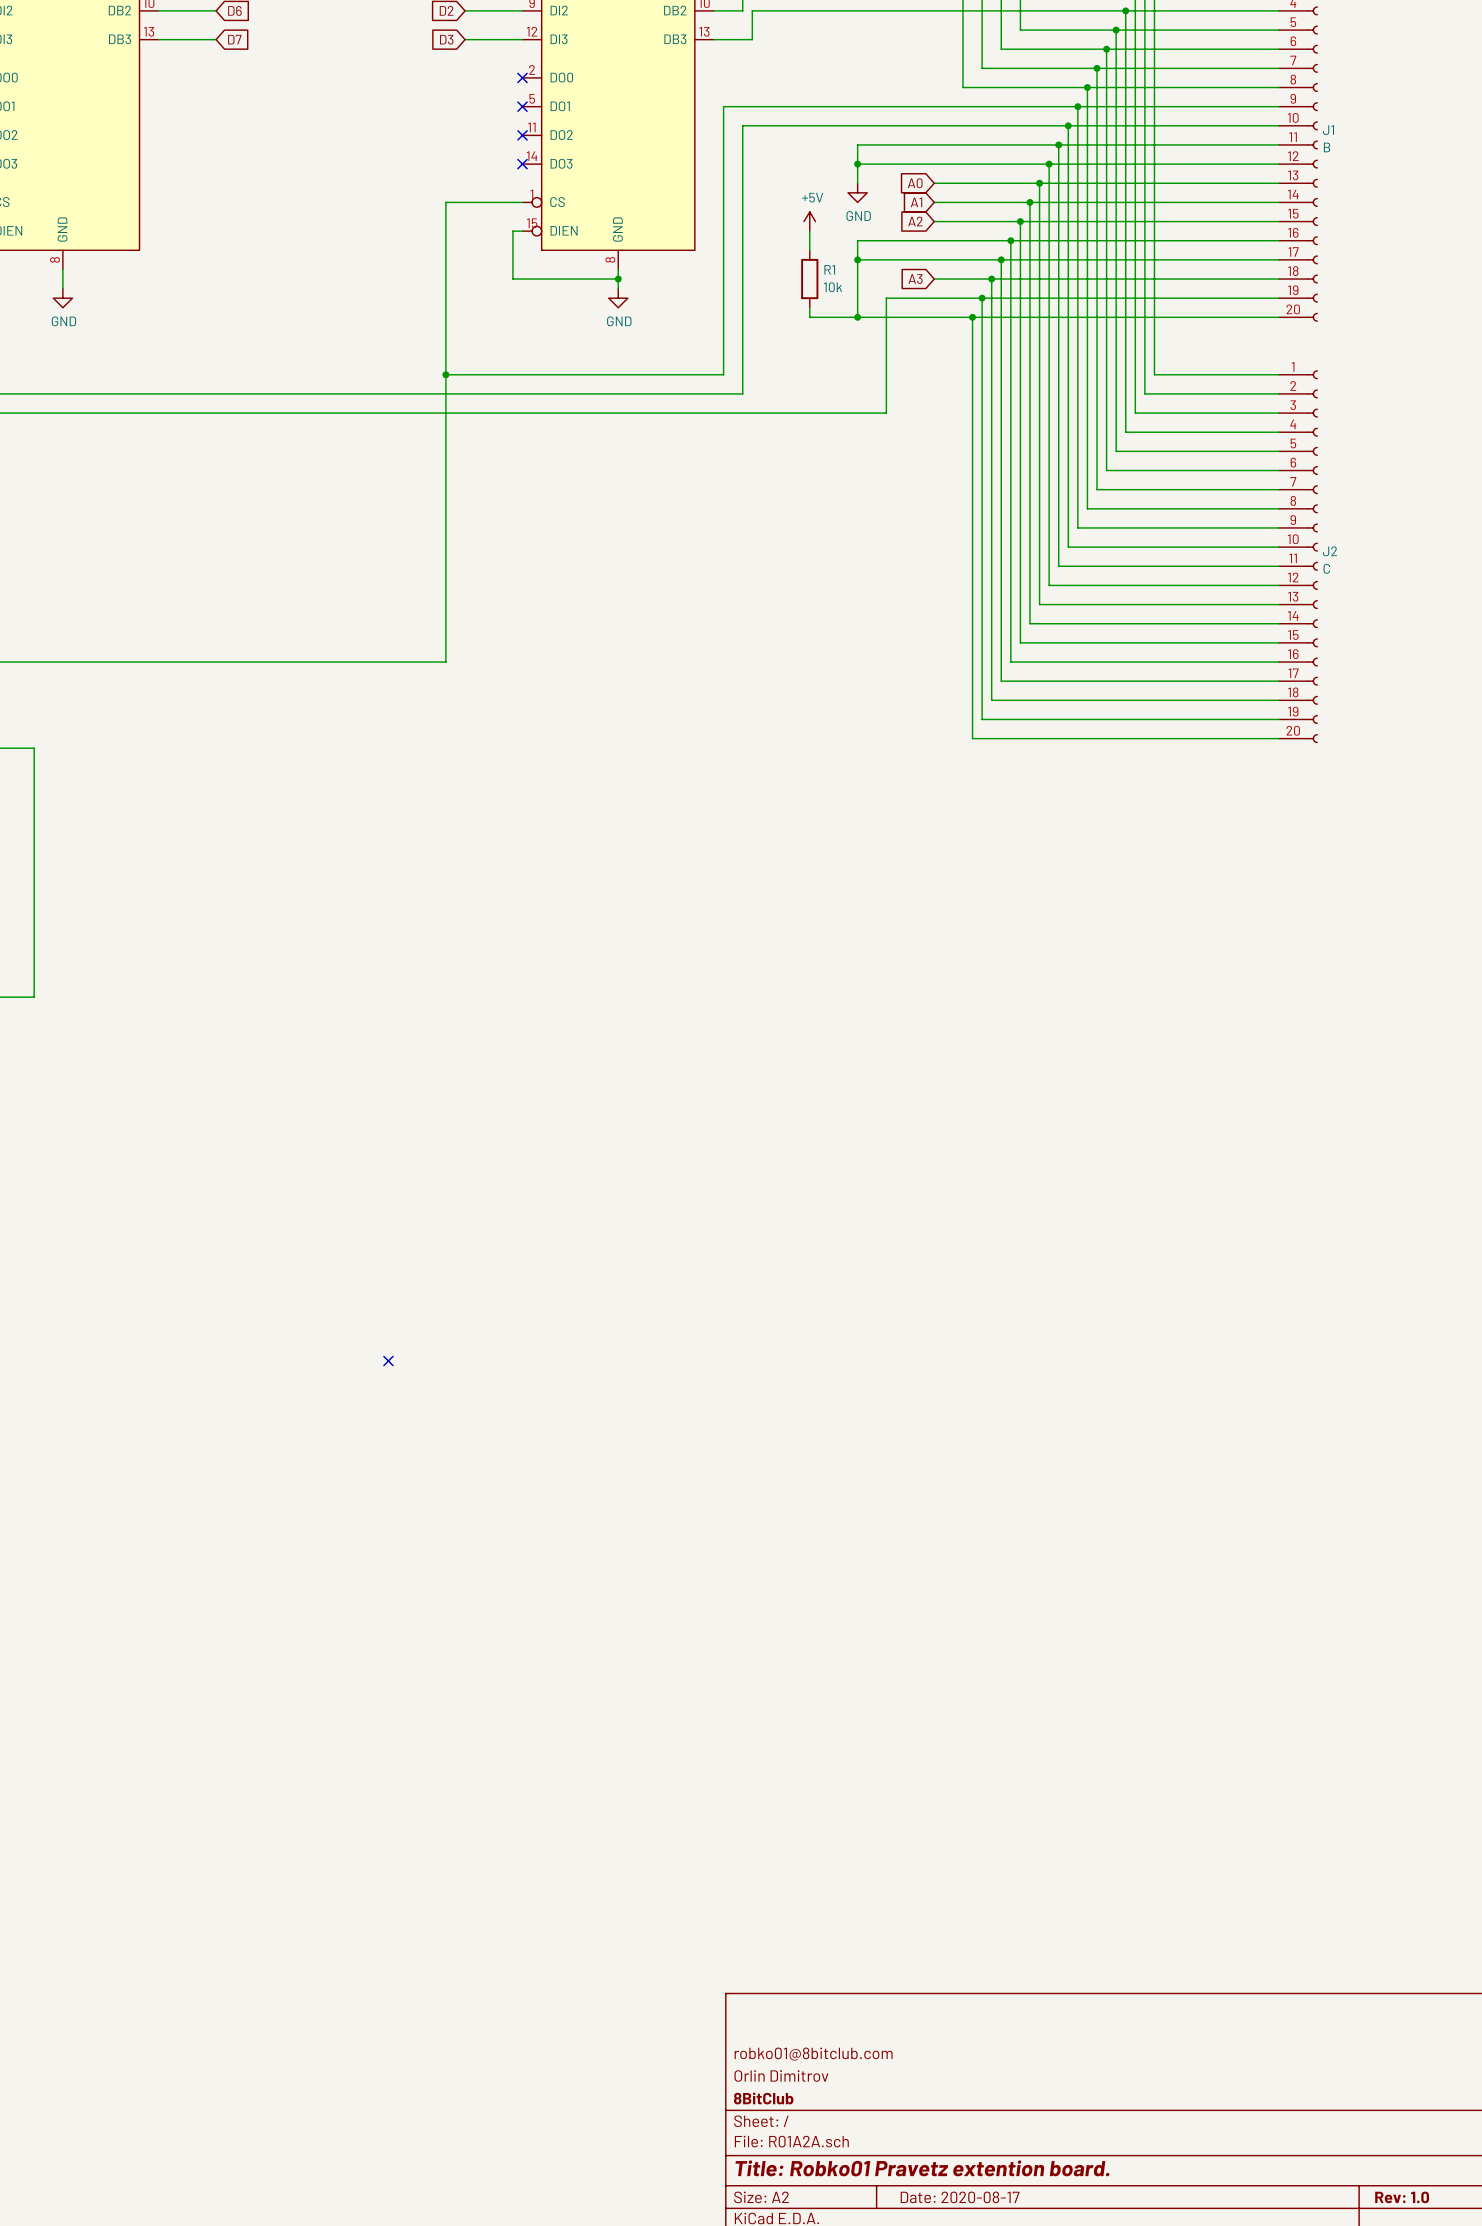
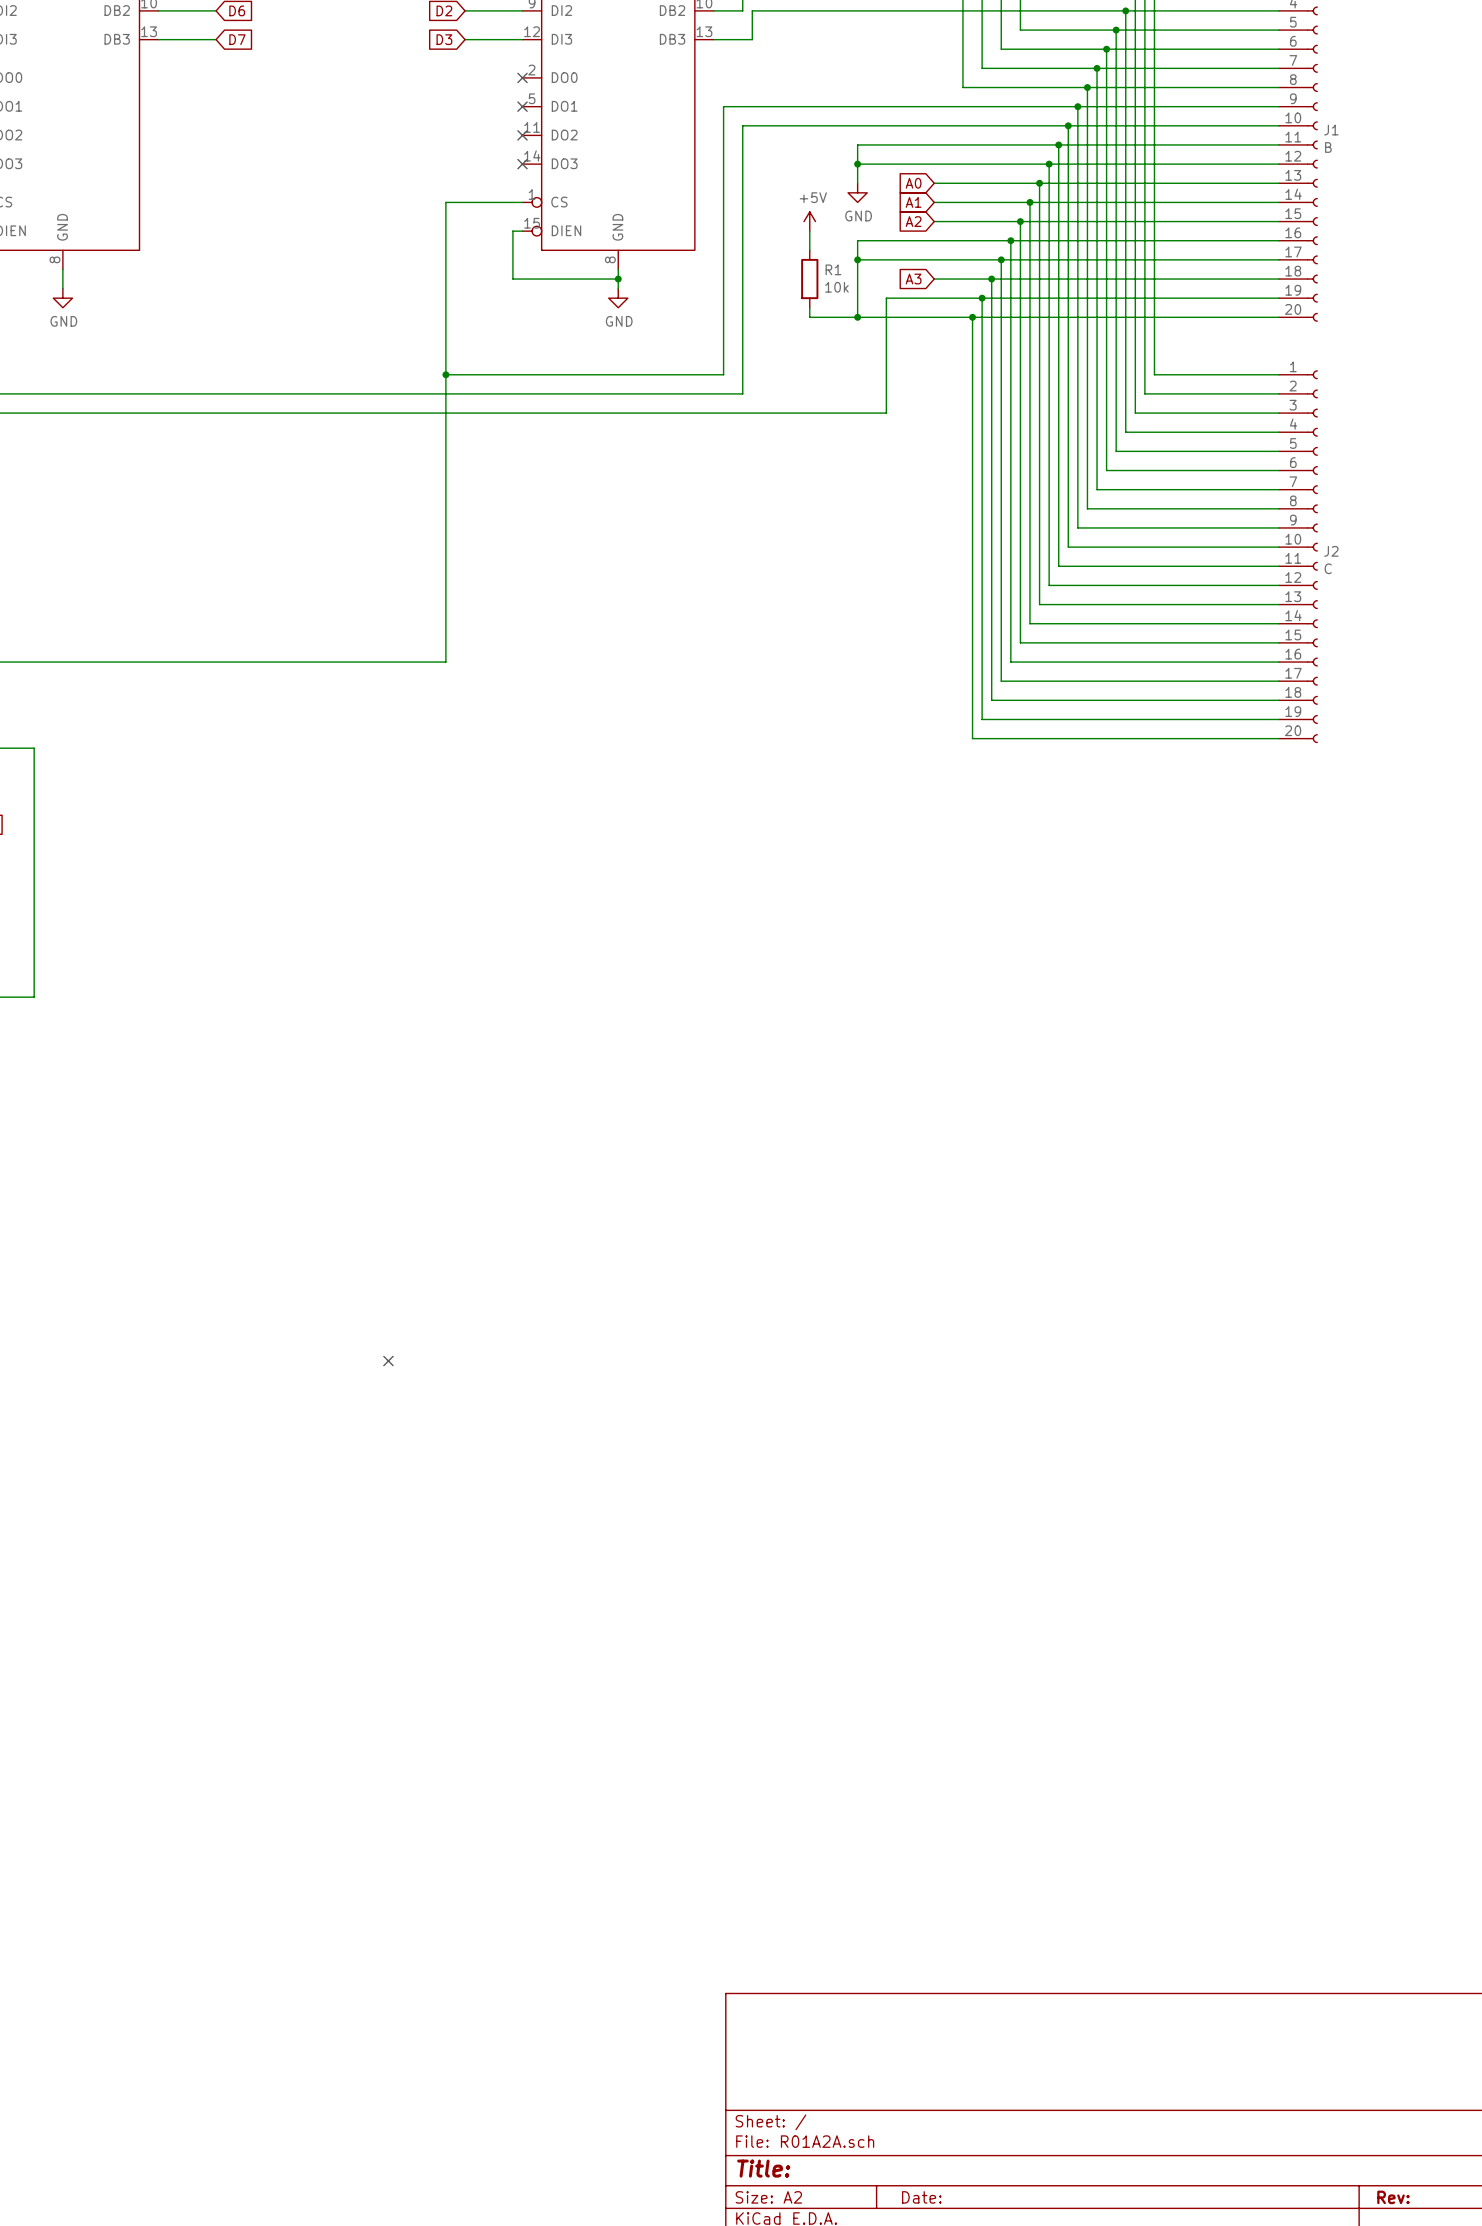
title block: robko01@8bitclub.com (813, 2054) -> none
title block: Orlin Dimitrov (781, 2075) -> none
title block: 8BitClub (763, 2098) -> none
title block: Title: Robko01 Pravetz extention board. (922, 2168) -> Title: (763, 2168)
title block: Date: 2020-08-17 (960, 2197) -> Date: (921, 2197)
title block: Rev: 1.0 (1402, 2197) -> Rev: (1393, 2197)

